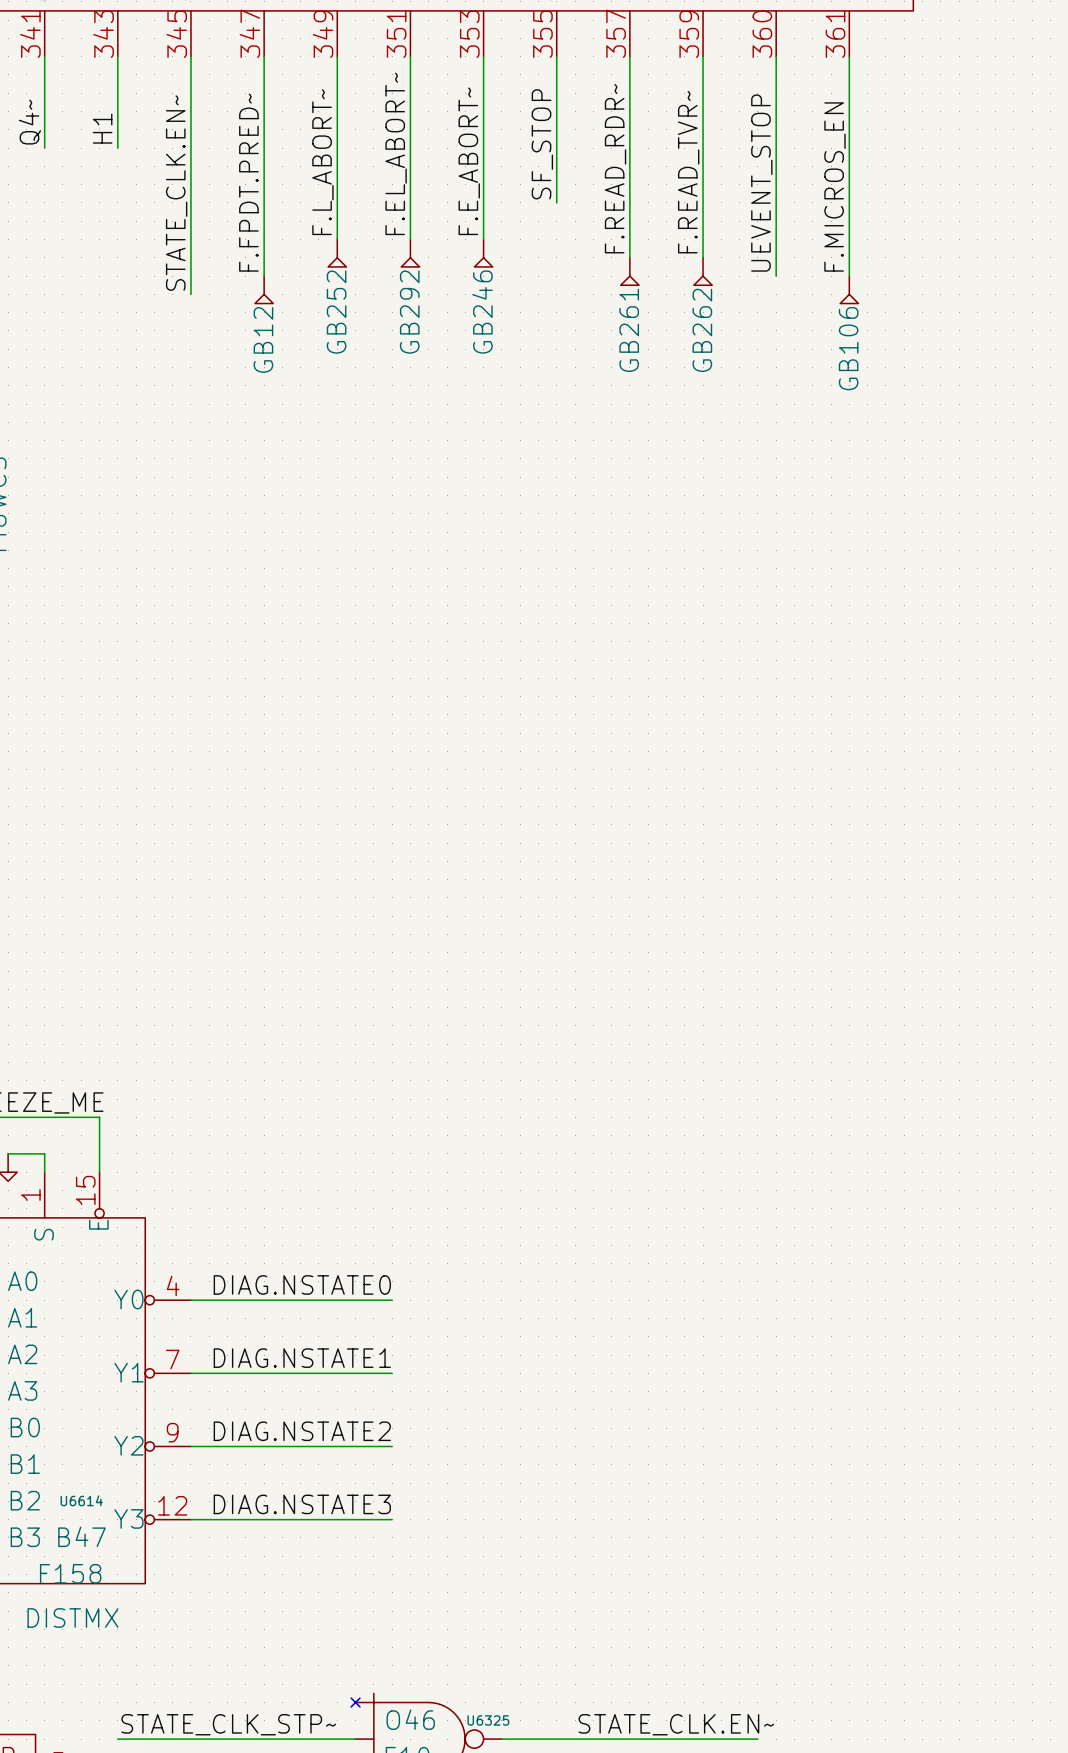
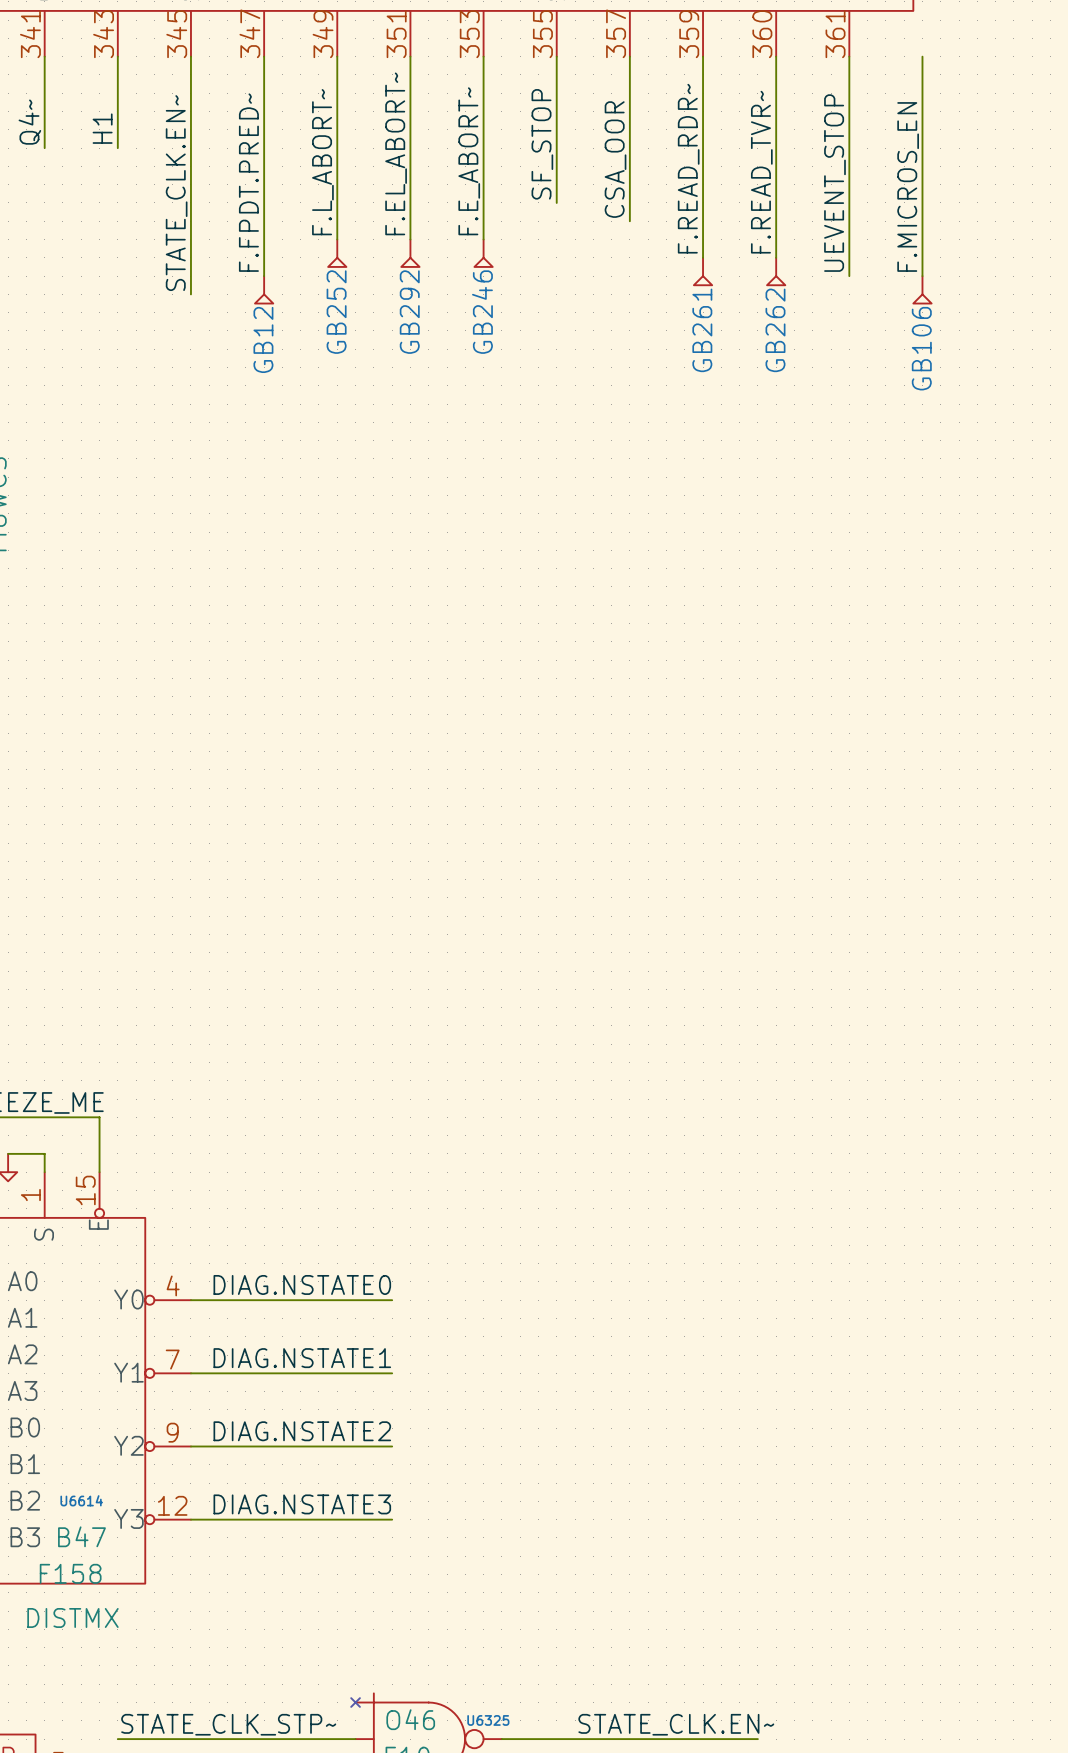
wire: none -> (922, 56) (922, 276)
label: none -> CSA_OOR (615, 159)
label: F.READ_RDR~ (615, 168) -> none
label: F.READ_TVR~ (688, 172) -> F.READ_RDR~ (688, 168)
label: none -> F.READ_TVR~ (761, 172)
label: UEVENT_STOP (761, 183) -> none
label: F.MICROS_EN (834, 186) -> UEVENT_STOP (834, 183)
label: none -> F.MICROS_EN (908, 186)
wire: (629, 221) (629, 257) -> none
GB261: (629, 271) -> none
GB262: none -> (776, 271)
GB106 position: (849, 290) -> (922, 290)
GB262 name: GB262 (702, 330) -> GB261 (702, 330)

